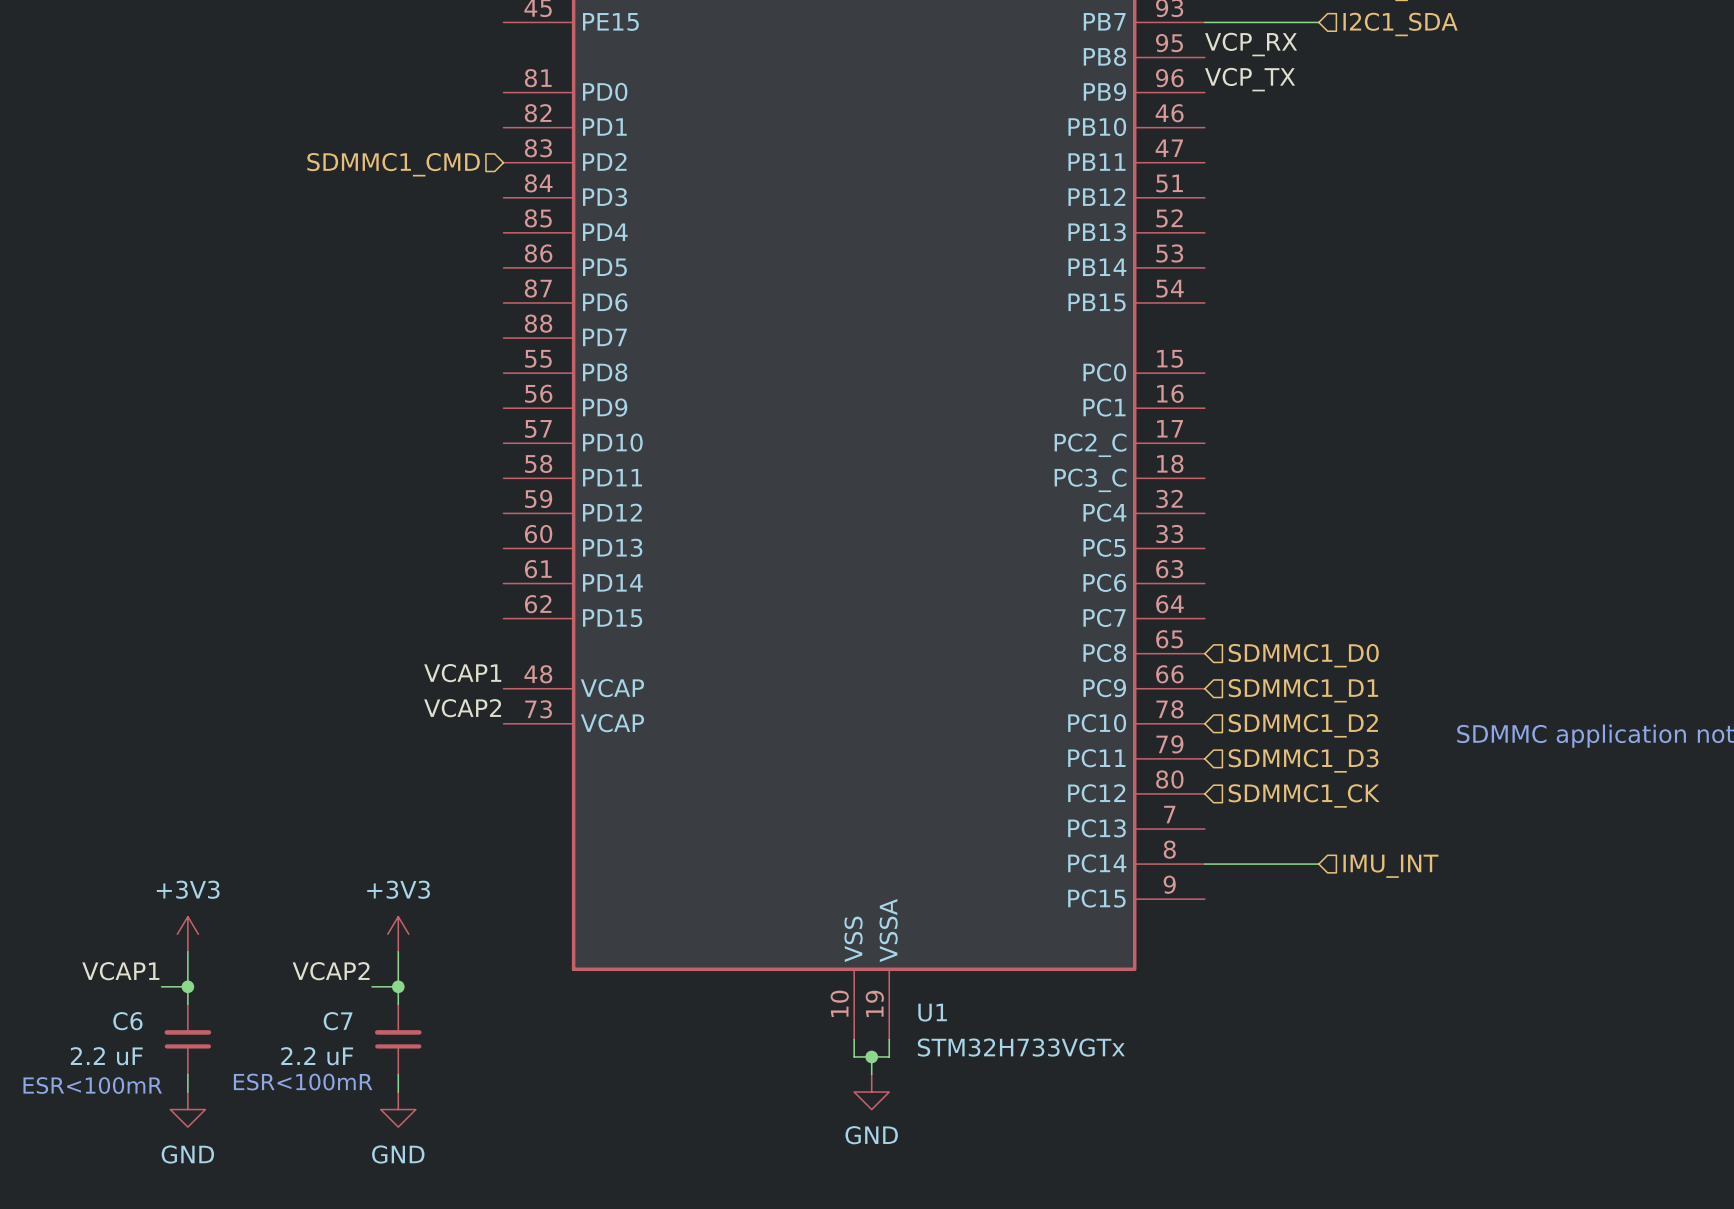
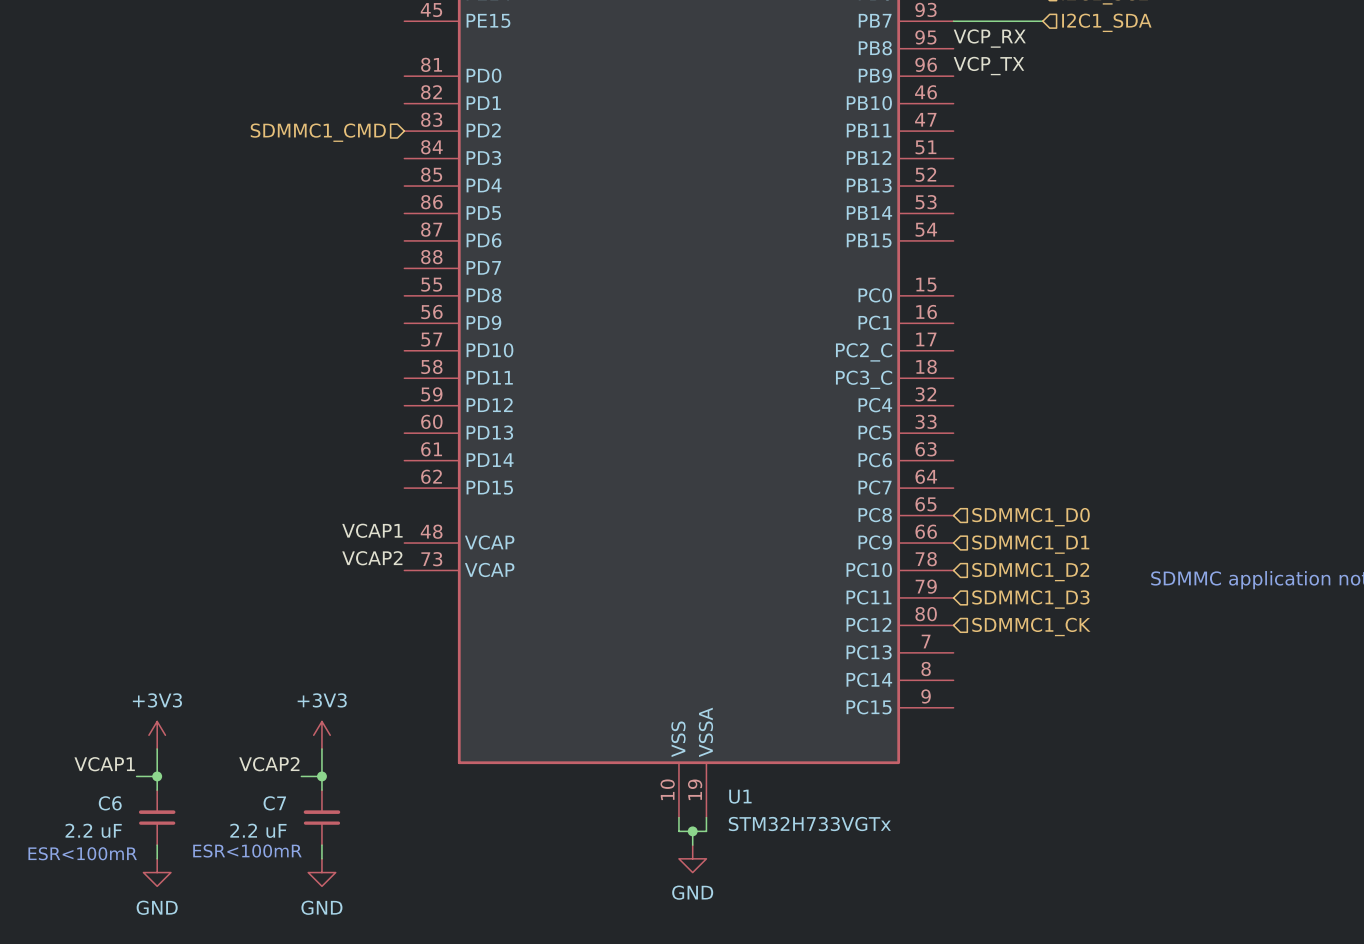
wire: (1204, 864) (1318, 864) -> none
hierarchical label: IMU_INT (1390, 866) -> none

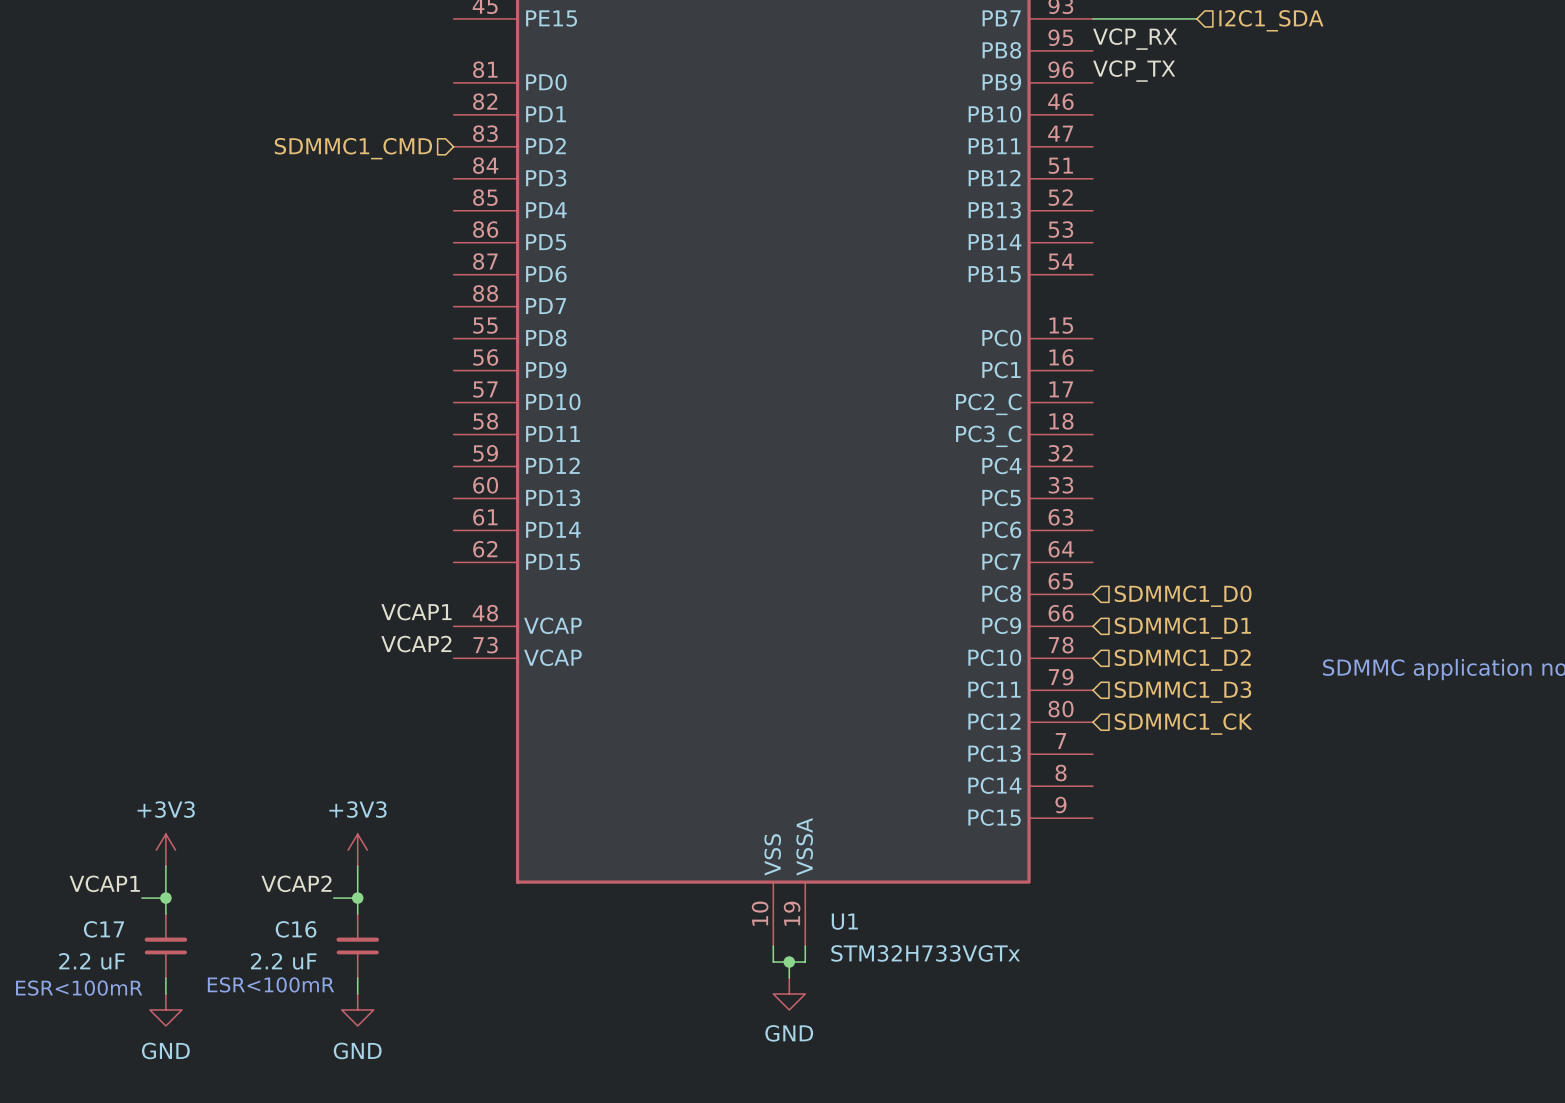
C6 name: C6 (110, 803) -> C17 (104, 929)
C7 name: C7 (274, 803) -> C16 (296, 929)

